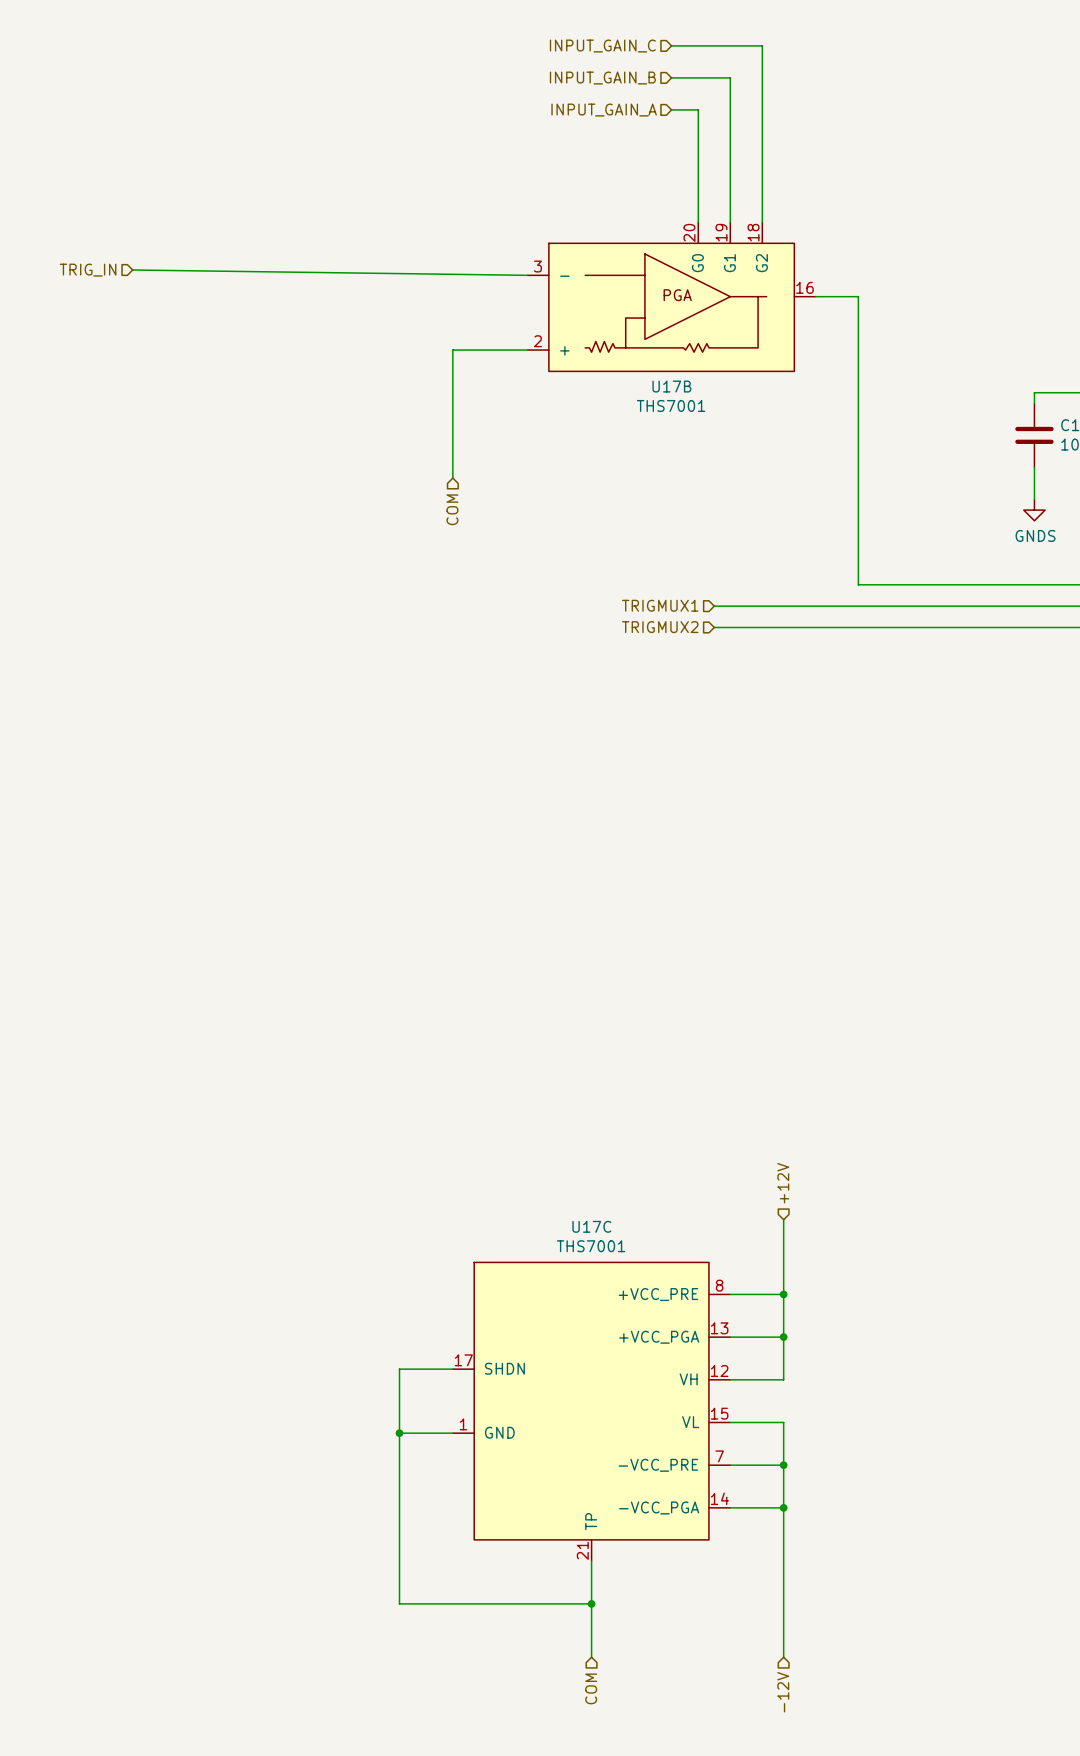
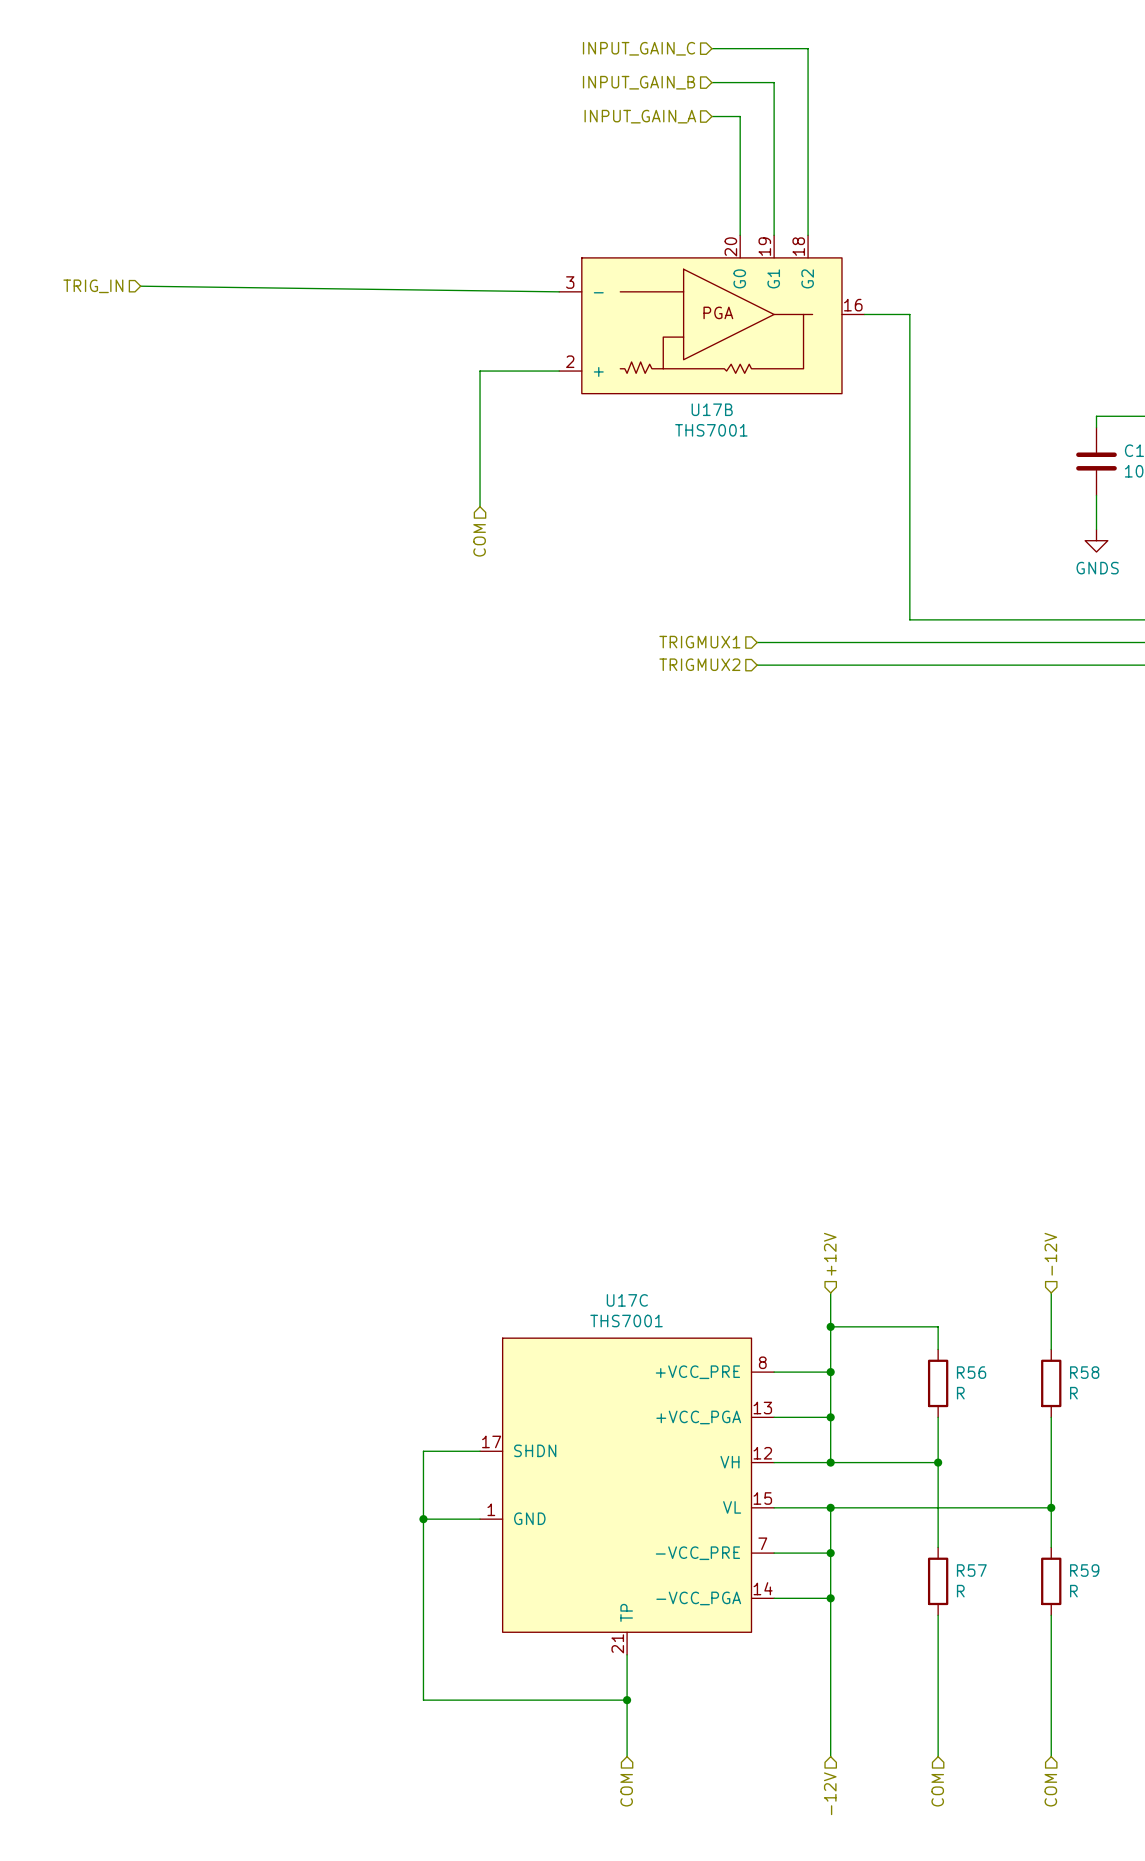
hierarchical label: none -> -12V (1050, 1254)
wire: none -> (1051, 1292) (1051, 1349)
wire: none -> (830, 1326) (938, 1326) (938, 1349)
junction: none -> (830, 1326)
R56: none -> R (938, 1383)
R58: none -> R (1051, 1383)
wire: none -> (938, 1417) (938, 1547)
wire: none -> (1051, 1417) (1051, 1547)
wire: none -> (830, 1462) (938, 1462)
junction: none -> (830, 1462)
junction: none -> (938, 1462)
wire: none -> (830, 1507) (1051, 1507)
junction: none -> (830, 1507)
junction: none -> (1051, 1507)
R57: none -> R (938, 1581)
R59: none -> R (1051, 1581)
wire: none -> (938, 1615) (938, 1756)
wire: none -> (1051, 1615) (1051, 1756)
hierarchical label: none -> COM (937, 1790)
hierarchical label: none -> COM (1050, 1790)

